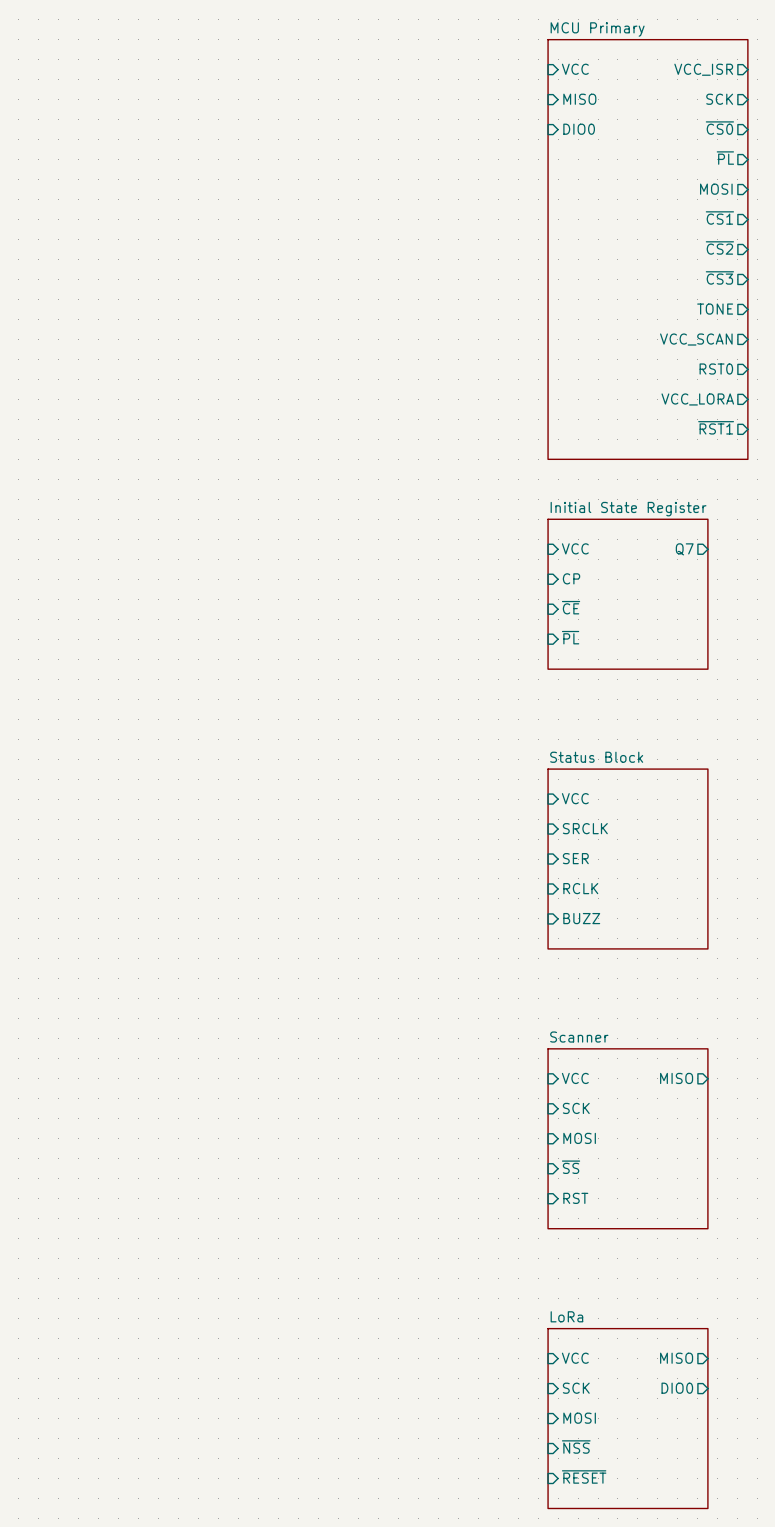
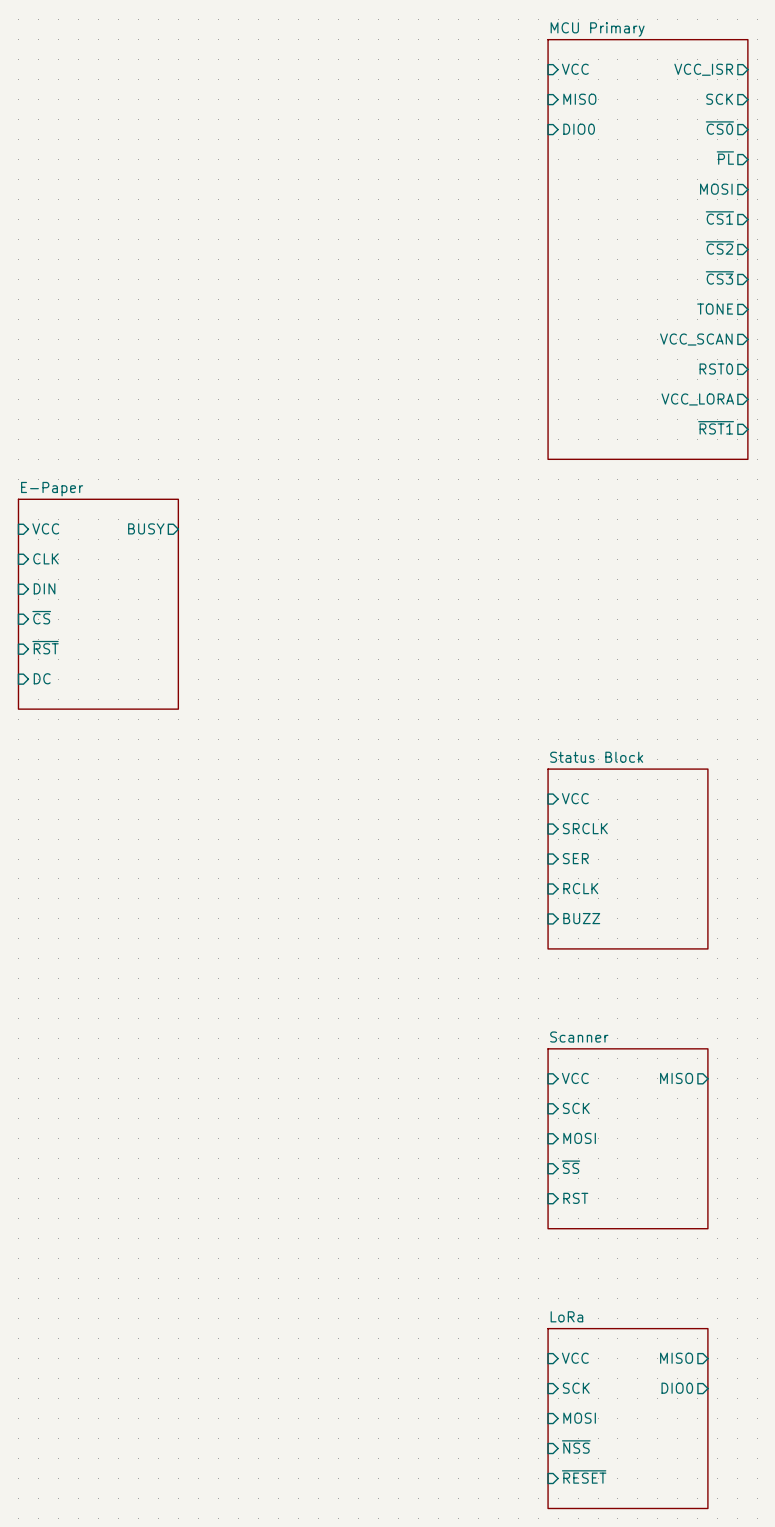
sheet pin: none -> VCC (45, 528)
sheet pin: none -> BUSY (146, 528)
sheet pin: VCC (575, 548) -> none
sheet pin: Q7 (684, 549) -> none
sheet pin: none -> CLK (45, 558)
sheet pin: CP (571, 578) -> none
sheet pin: none -> DIN (44, 588)
sheet Initial State Register: (627, 594) -> none
sheet E-Paper: none -> (98, 604)
sheet pin: ~{CE} (571, 607) -> none
sheet pin: none -> ~{CS} (41, 617)
sheet pin: ~{PL} (570, 637) -> none
sheet pin: none -> ~{RST} (45, 647)
sheet pin: none -> DC (42, 678)

